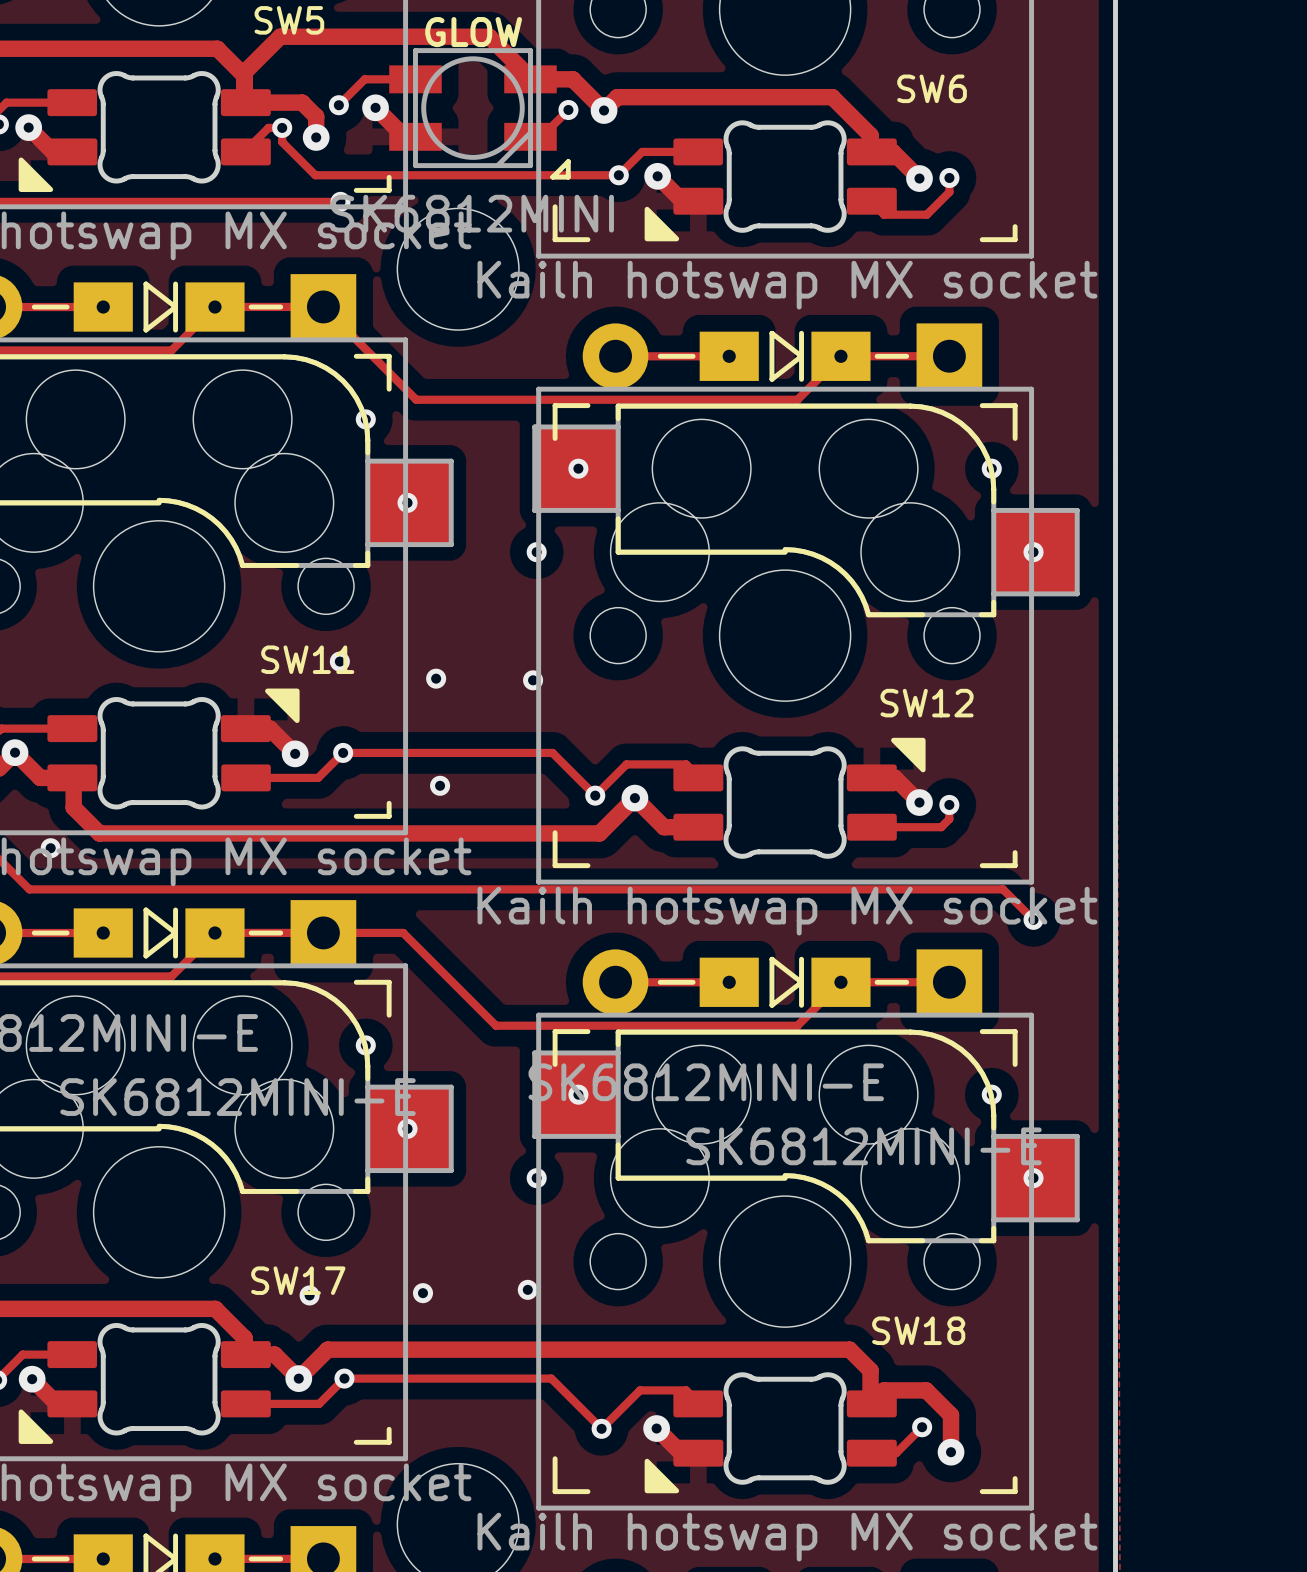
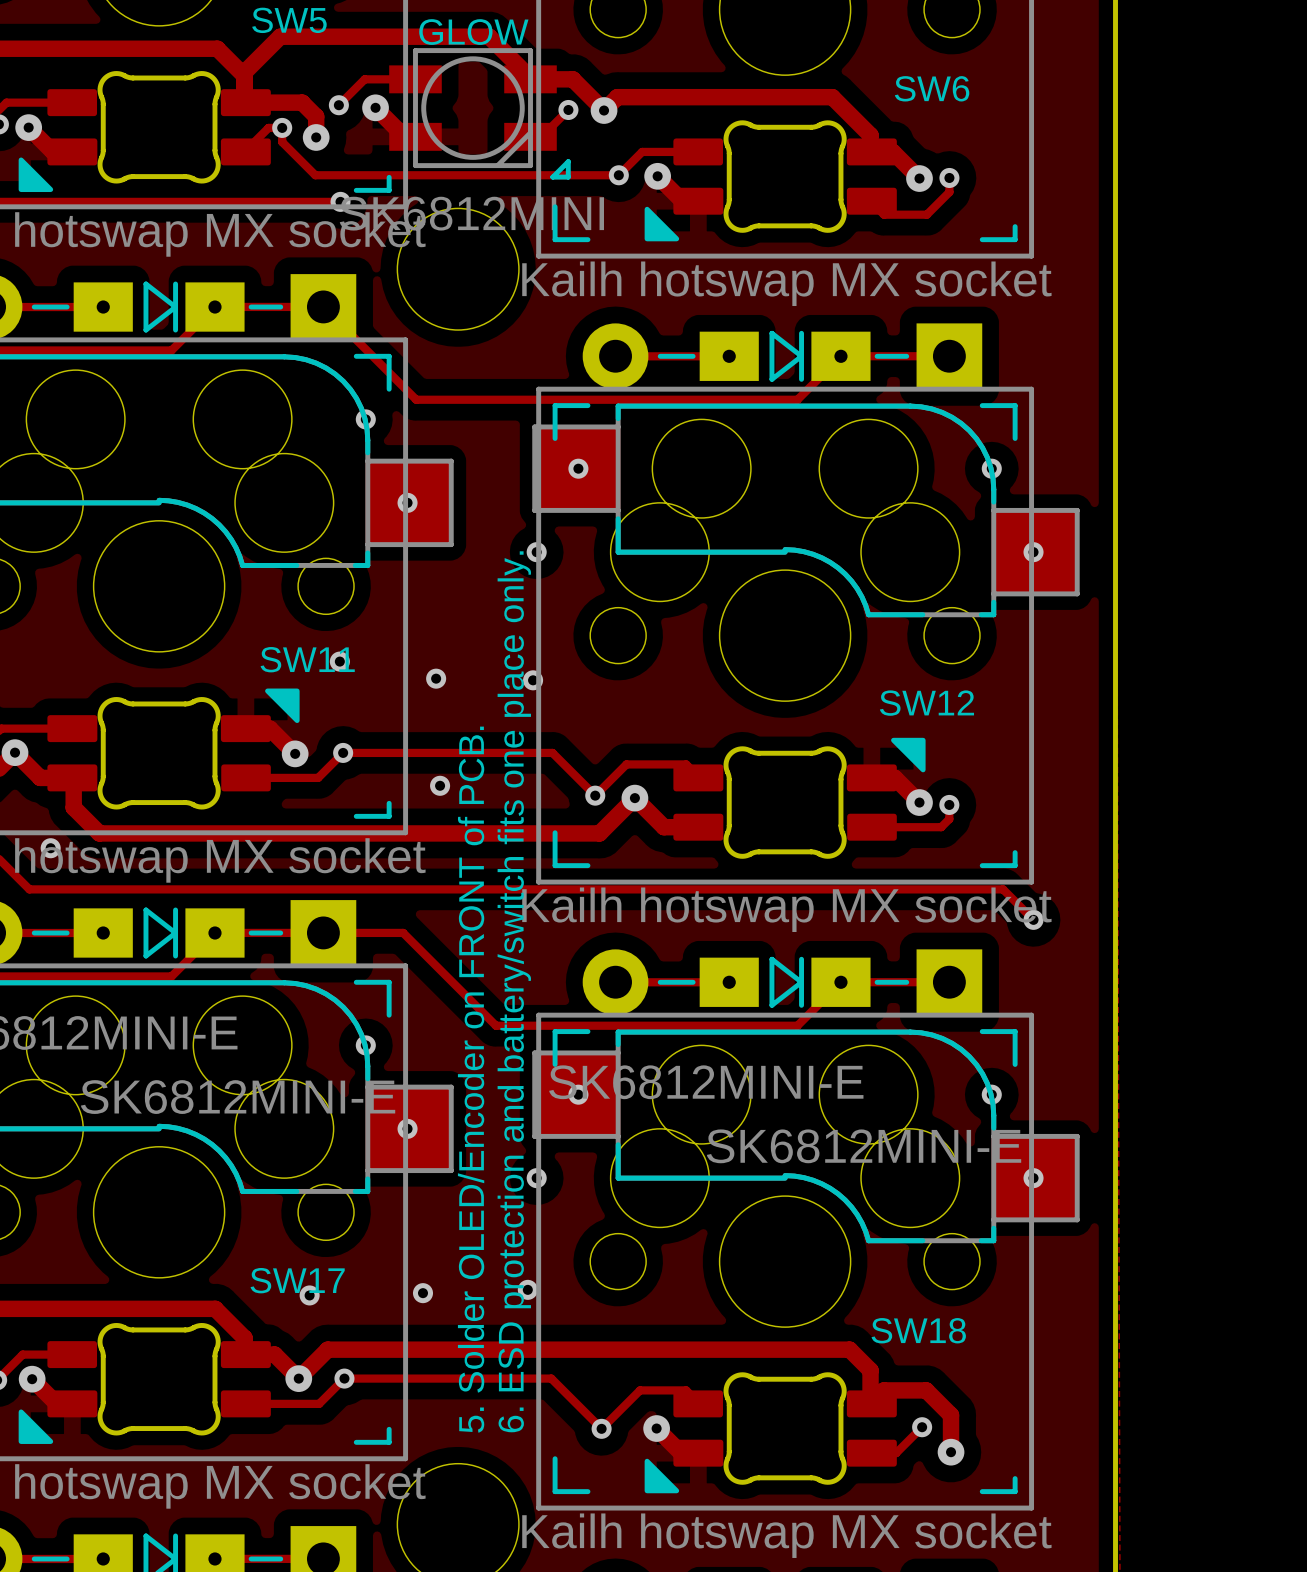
text: none -> 6. ESD protection and battery/switch fits one place only. (514, 991)
text: none -> 5. Solder OLED/Encoder on FRONT of PCB. (471, 1079)

